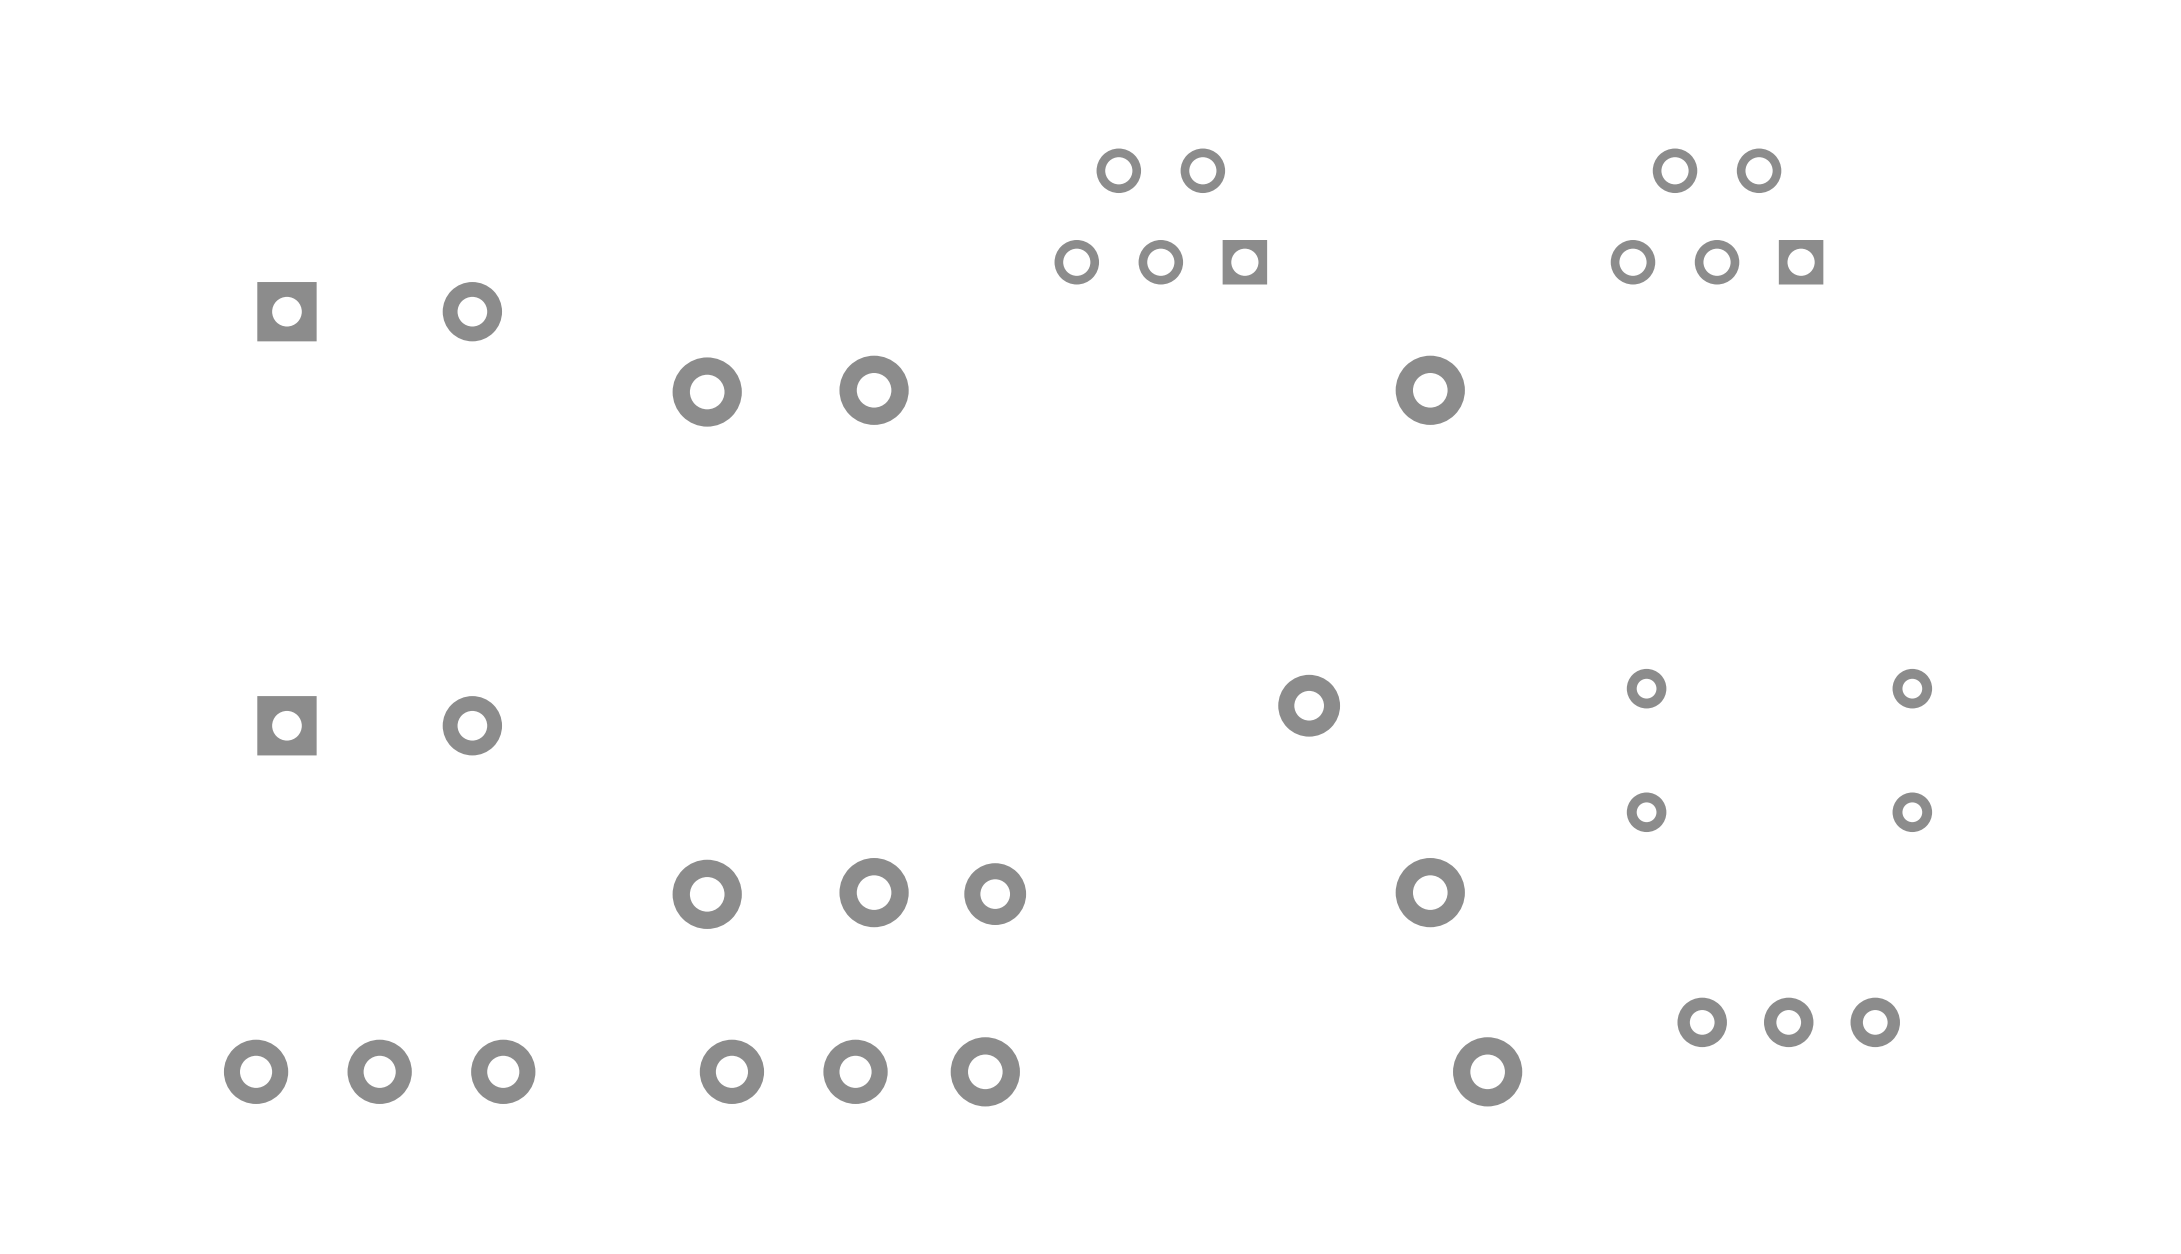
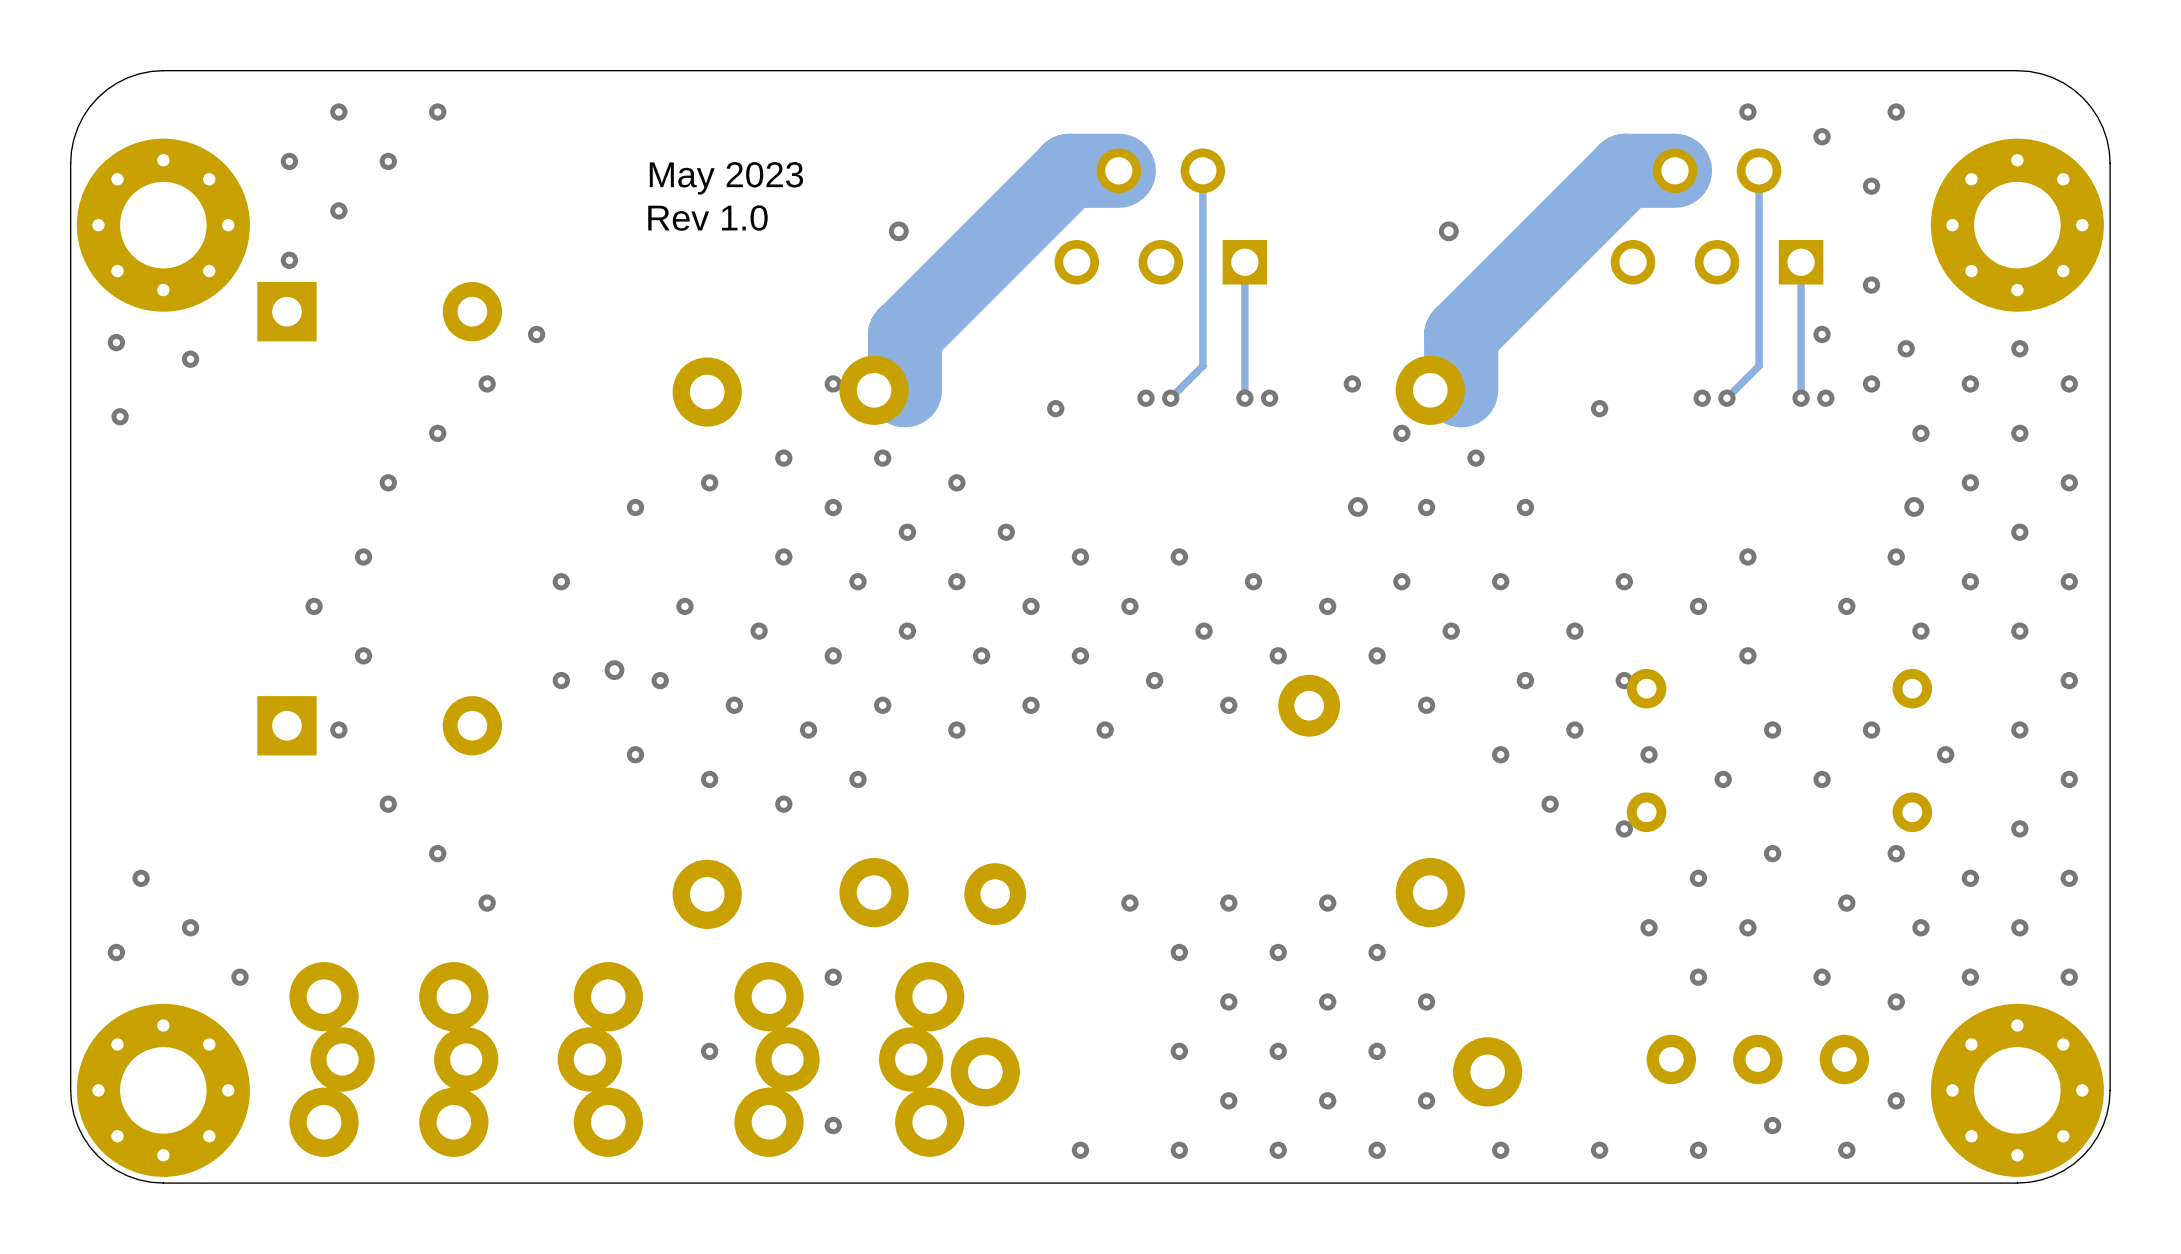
board edge: none -> (2017, 70) (163, 70) (139, 73) (117, 83) (97, 97) (83, 117) (73, 139) (70, 163) (70, 1090) (73, 1114) (83, 1136) (97, 1155) (117, 1170) (139, 1179) (163, 1183) (2017, 1183) (2041, 1179) (2063, 1170) (2082, 1155) (2097, 1136) (2106, 1114) (2110, 1090) (2110, 163) (2109, 151) (2103, 127) (2090, 106) (2082, 97) (2073, 89) (2052, 77) (2041, 73) (2017, 70)
via: none -> (338, 112)
via: none -> (437, 112)
via: none -> (1747, 112)
via: none -> (1896, 112)
via: none -> (1822, 136)
via: none -> (289, 161)
via: none -> (388, 161)
track: none -> (1118, 170) (1069, 170) (904, 335) (904, 390)
track: none -> (1202, 170) (1202, 366) (1170, 398)
track: none -> (1675, 170) (1625, 170) (1461, 335) (1461, 390)
track: none -> (1759, 170) (1759, 366) (1726, 398)
text: none -> May 2023 (726, 178)
via: none -> (1871, 186)
via: none -> (338, 210)
text: none -> Rev 1.0 (707, 218)
part: none -> (163, 225)
part: none -> (2017, 225)
via: none -> (898, 231)
via: none -> (1448, 231)
via: none -> (289, 260)
track: none -> (1244, 262) (1244, 398)
track: none -> (1801, 262) (1801, 398)
via: none -> (1871, 285)
via: none -> (536, 334)
via: none -> (1822, 334)
via: none -> (116, 342)
via: none -> (1906, 348)
via: none -> (2019, 348)
via: none -> (190, 359)
via: none -> (487, 383)
via: none -> (833, 383)
via: none -> (1352, 383)
via: none -> (1871, 383)
via: none -> (1970, 383)
via: none -> (2069, 383)
via: none -> (1146, 398)
via: none -> (1170, 398)
via: none -> (1244, 398)
via: none -> (1269, 398)
via: none -> (1702, 398)
via: none -> (1726, 398)
via: none -> (1801, 398)
via: none -> (1825, 398)
via: none -> (1055, 408)
via: none -> (1599, 408)
via: none -> (120, 416)
via: none -> (437, 433)
via: none -> (1401, 433)
via: none -> (1920, 433)
via: none -> (2019, 433)
via: none -> (783, 458)
via: none -> (882, 458)
via: none -> (1475, 458)
via: none -> (388, 482)
via: none -> (709, 482)
via: none -> (956, 482)
via: none -> (1970, 482)
via: none -> (2069, 482)
via: none -> (1357, 506)
via: none -> (1914, 506)
via: none -> (635, 507)
via: none -> (833, 507)
via: none -> (1426, 507)
via: none -> (1525, 507)
via: none -> (907, 532)
via: none -> (1006, 532)
via: none -> (2019, 532)
via: none -> (363, 556)
via: none -> (783, 556)
via: none -> (1080, 556)
via: none -> (1179, 556)
via: none -> (1747, 556)
via: none -> (1896, 556)
via: none -> (561, 581)
via: none -> (857, 581)
via: none -> (956, 581)
via: none -> (1253, 581)
via: none -> (1401, 581)
via: none -> (1500, 581)
via: none -> (1624, 581)
via: none -> (1970, 581)
via: none -> (2069, 581)
via: none -> (314, 606)
via: none -> (684, 606)
via: none -> (1031, 606)
via: none -> (1129, 606)
via: none -> (1327, 606)
via: none -> (1698, 606)
via: none -> (1846, 606)
via: none -> (759, 631)
via: none -> (907, 631)
via: none -> (1204, 631)
via: none -> (1451, 631)
via: none -> (1574, 631)
via: none -> (1920, 631)
via: none -> (2019, 631)
via: none -> (363, 655)
via: none -> (833, 655)
via: none -> (981, 655)
via: none -> (1080, 655)
via: none -> (1278, 655)
via: none -> (1377, 655)
via: none -> (1747, 655)
via: none -> (614, 670)
via: none -> (561, 680)
via: none -> (660, 680)
via: none -> (1154, 680)
via: none -> (1525, 680)
via: none -> (1624, 680)
via: none -> (2069, 680)
via: none -> (734, 705)
via: none -> (882, 705)
via: none -> (1031, 705)
via: none -> (1228, 705)
via: none -> (1426, 705)
via: none -> (338, 730)
via: none -> (808, 730)
via: none -> (956, 730)
via: none -> (1105, 730)
via: none -> (1574, 730)
via: none -> (1772, 730)
via: none -> (1871, 730)
via: none -> (2019, 730)
via: none -> (635, 754)
via: none -> (1500, 754)
via: none -> (1649, 754)
via: none -> (1945, 754)
via: none -> (709, 779)
via: none -> (857, 779)
via: none -> (1723, 779)
via: none -> (1822, 779)
via: none -> (2069, 779)
via: none -> (388, 804)
via: none -> (783, 804)
via: none -> (1550, 804)
via: none -> (1624, 828)
via: none -> (2019, 828)
via: none -> (437, 853)
via: none -> (1772, 853)
via: none -> (1896, 853)
via: none -> (141, 878)
via: none -> (1698, 878)
via: none -> (1970, 878)
via: none -> (2069, 878)
via: none -> (487, 903)
via: none -> (1129, 903)
via: none -> (1228, 903)
via: none -> (1327, 903)
via: none -> (1846, 903)
via: none -> (190, 927)
via: none -> (1649, 927)
via: none -> (1747, 927)
via: none -> (1920, 927)
via: none -> (2019, 927)
via: none -> (116, 952)
via: none -> (1179, 952)
via: none -> (1278, 952)
via: none -> (1377, 952)
via: none -> (239, 977)
via: none -> (833, 977)
via: none -> (1698, 977)
via: none -> (1822, 977)
via: none -> (1970, 977)
via: none -> (2069, 977)
via: none -> (1228, 1001)
via: none -> (1327, 1001)
via: none -> (1426, 1001)
via: none -> (1896, 1001)
part position: (1788, 1022) -> (1757, 1059)
via: none -> (709, 1051)
via: none -> (1179, 1051)
via: none -> (1278, 1051)
via: none -> (1377, 1051)
part: none -> (324, 1059)
part: none -> (453, 1059)
part: none -> (608, 1059)
part: none -> (769, 1059)
part: none -> (929, 1059)
part position: (379, 1071) -> (466, 1059)
part position: (793, 1071) -> (849, 1059)
part: none -> (163, 1090)
part: none -> (2017, 1090)
via: none -> (1228, 1100)
via: none -> (1327, 1100)
via: none -> (1426, 1100)
via: none -> (1896, 1100)
via: none -> (833, 1125)
via: none -> (1772, 1125)
via: none -> (1080, 1150)
via: none -> (1179, 1150)
via: none -> (1278, 1150)
via: none -> (1377, 1150)
via: none -> (1500, 1150)
via: none -> (1599, 1150)
via: none -> (1698, 1150)
via: none -> (1846, 1150)

